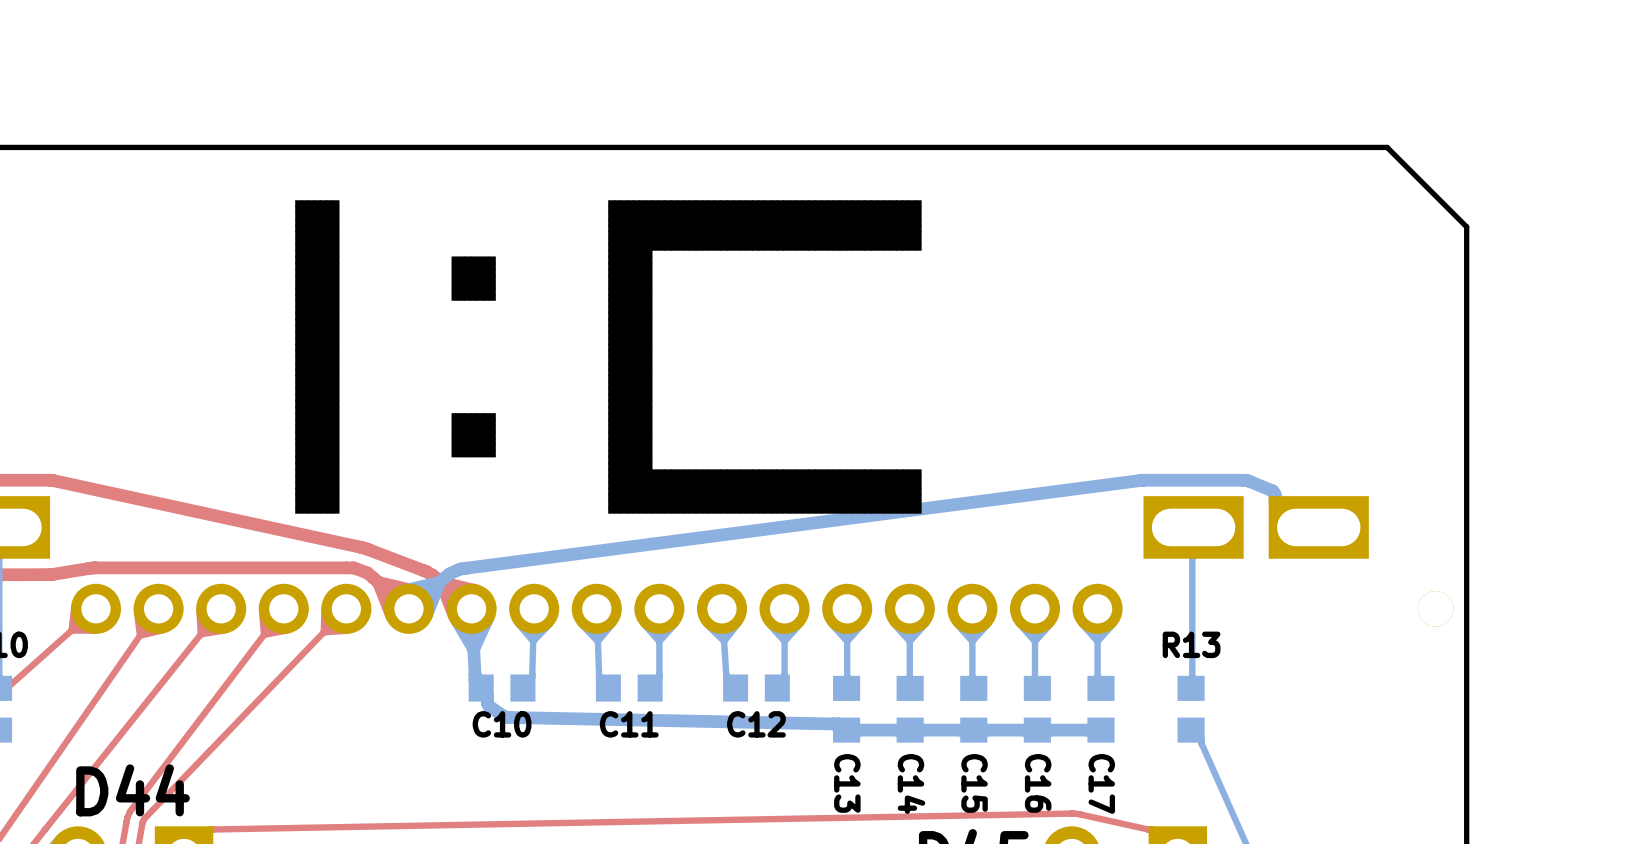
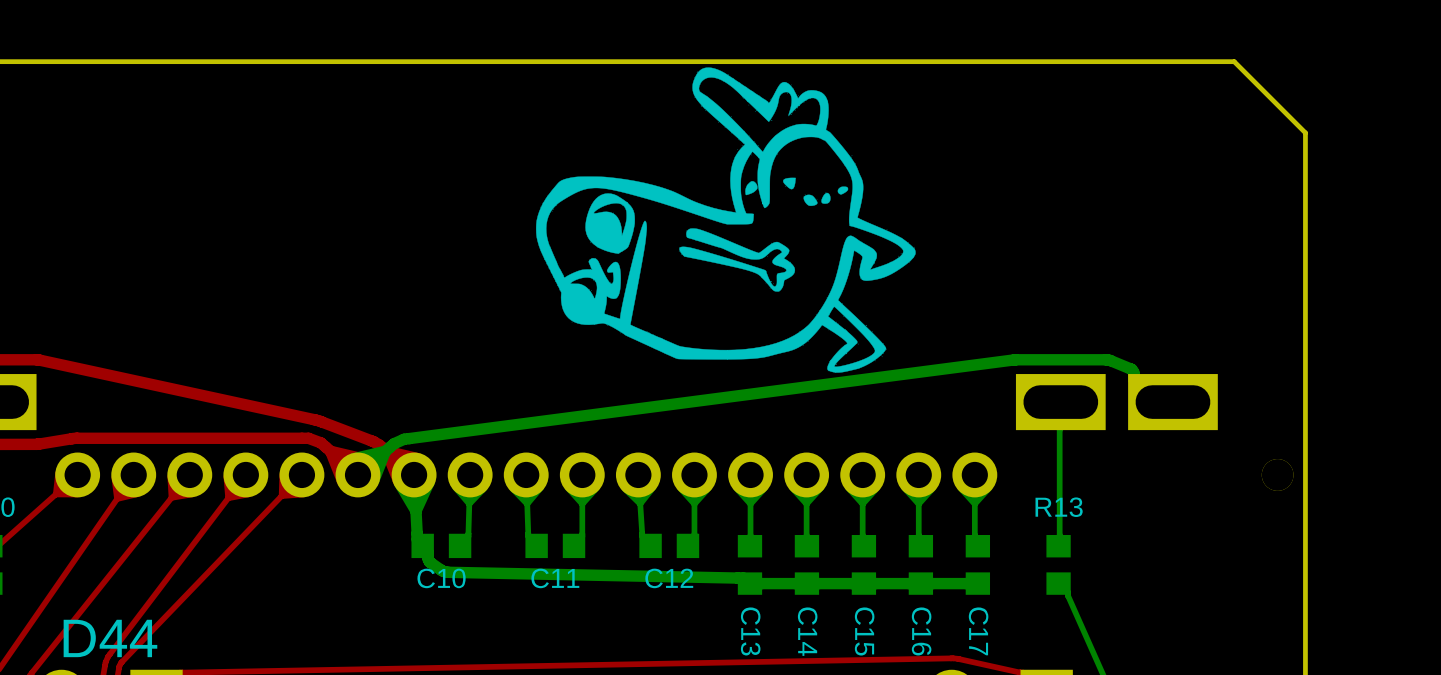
drawing: none -> [536, 67, 916, 373]
drawing: [295, 200, 922, 514] -> none

